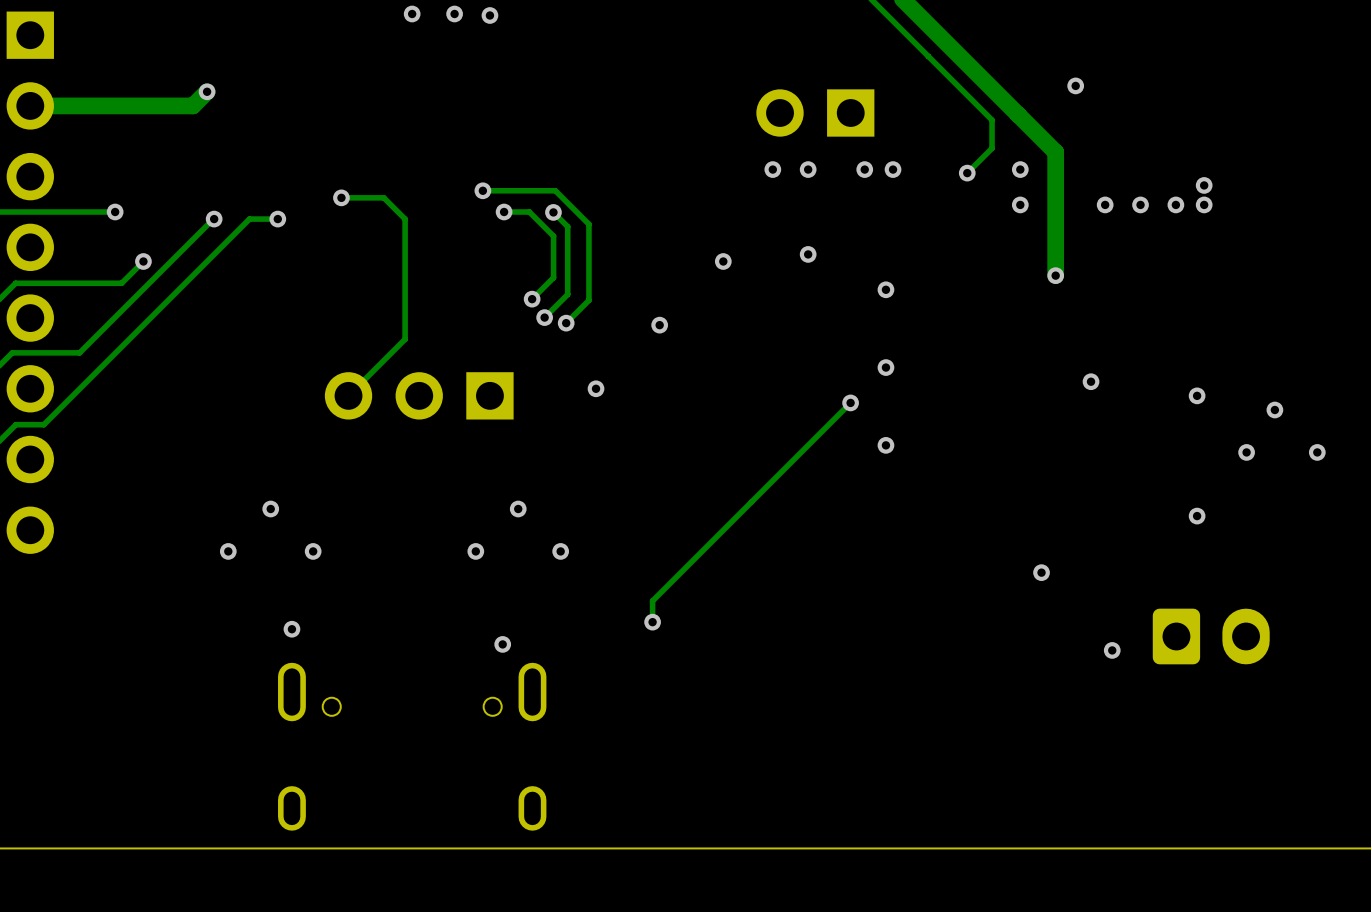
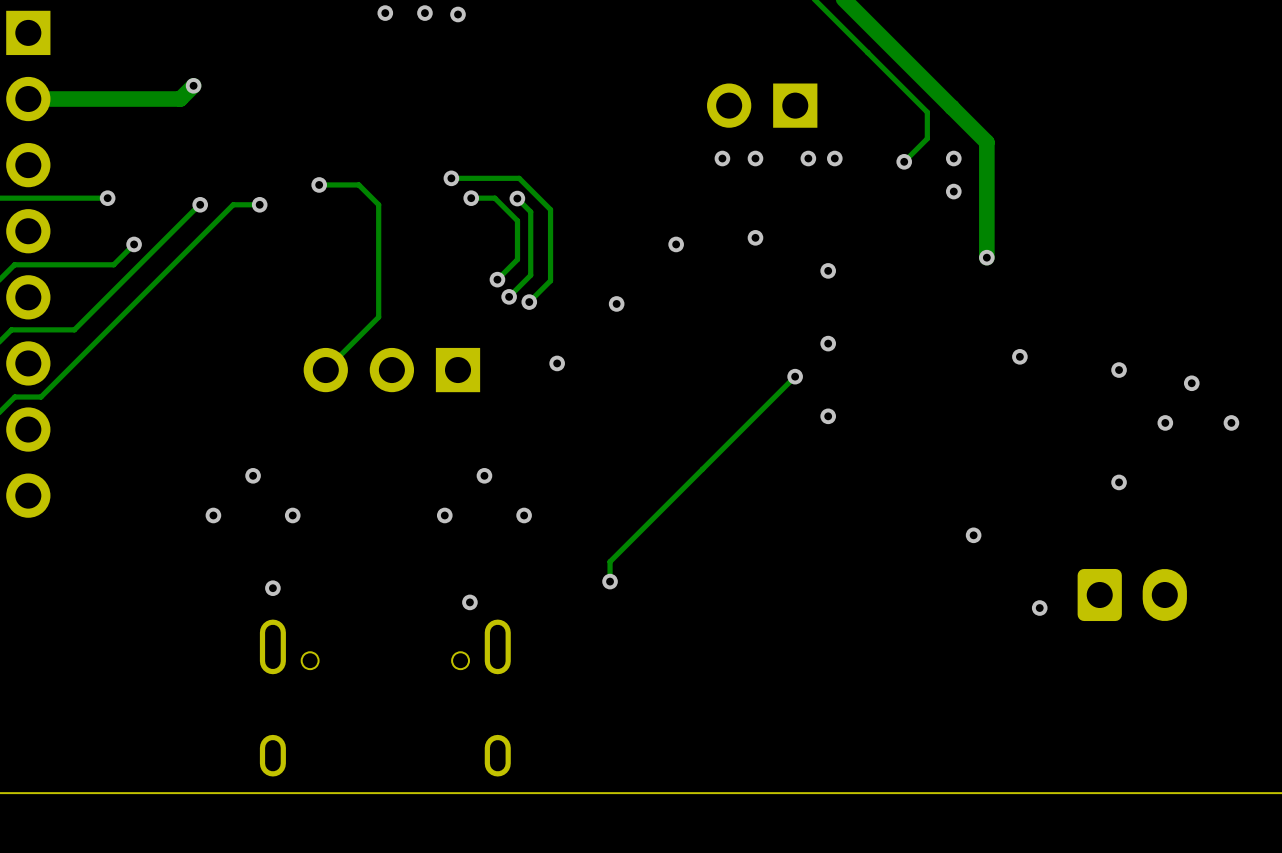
via: (1075, 85) -> none
via: (1204, 185) -> none
via: (1105, 204) -> none
via: (1140, 204) -> none
via: (1175, 204) -> none
via: (1204, 204) -> none

